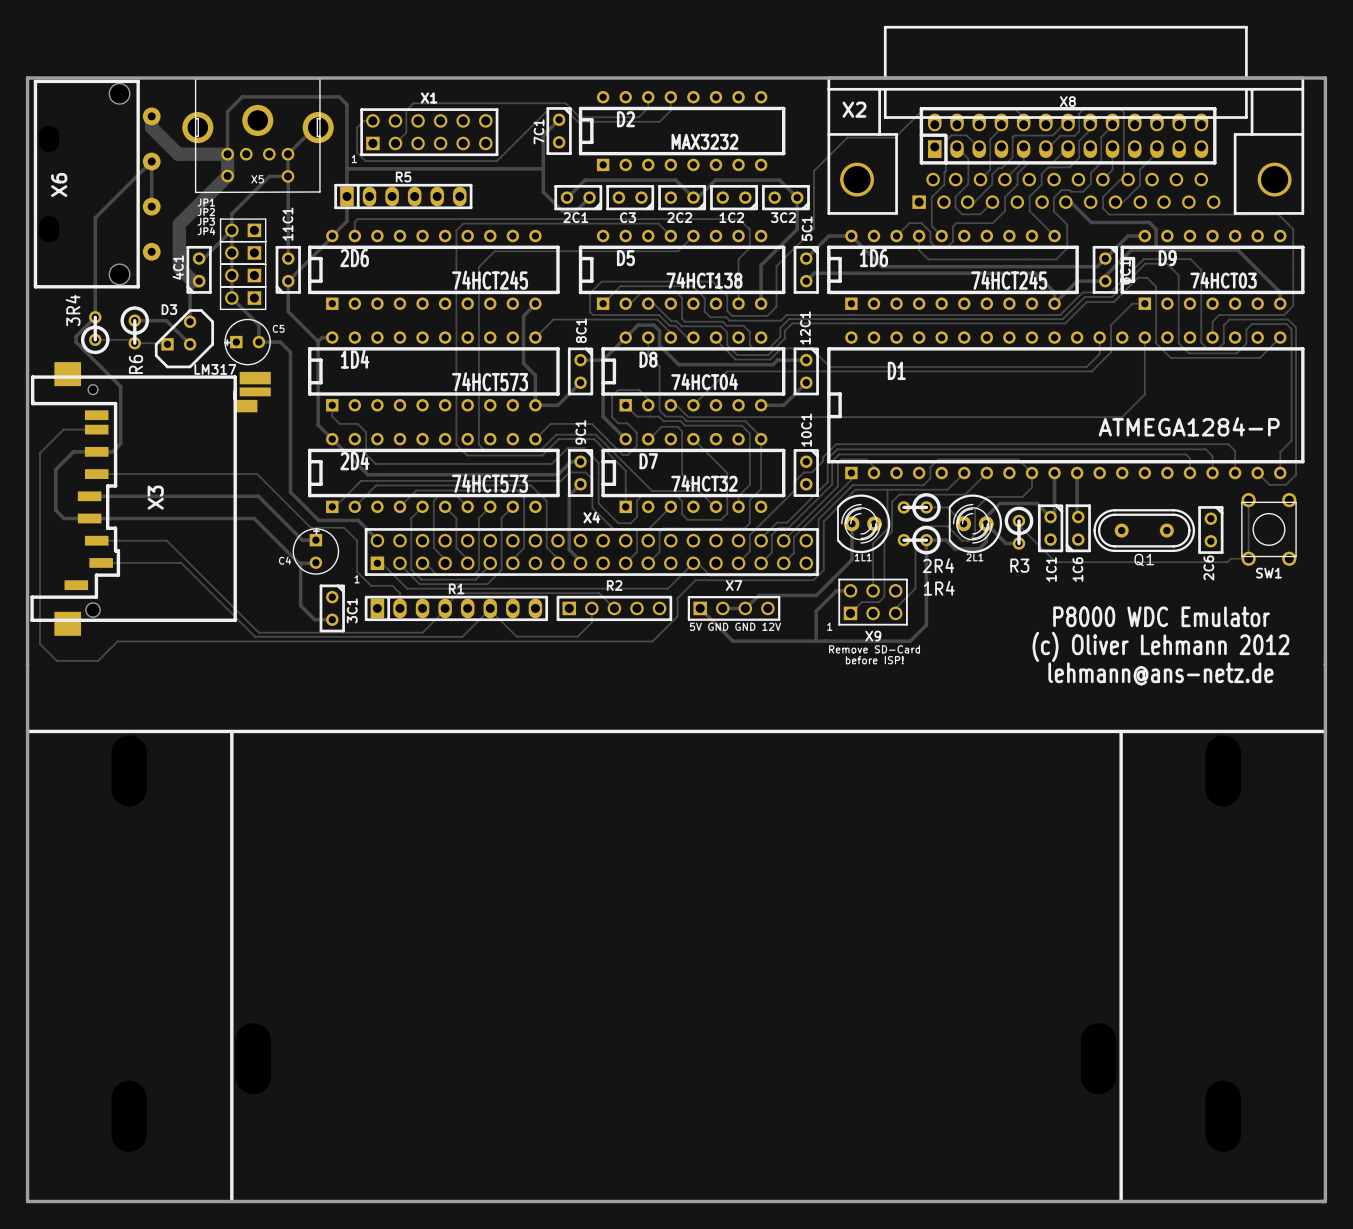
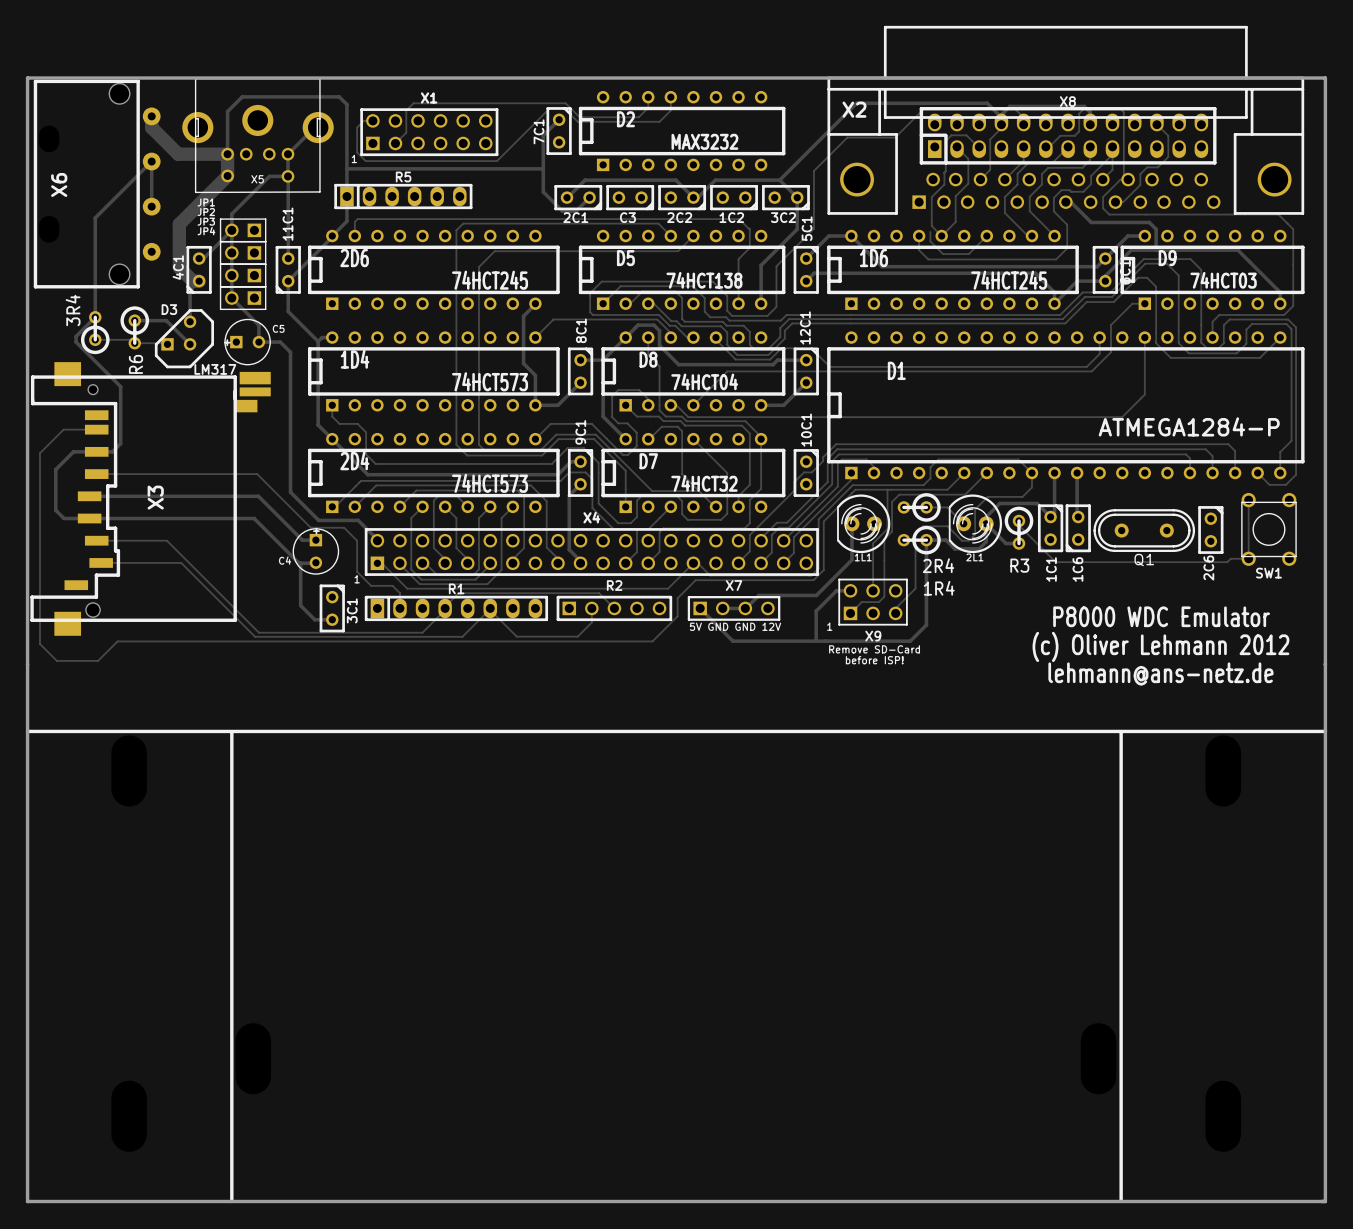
track: none -> (1001, 117) (987, 103) (856, 103) (779, 180)
track: none -> (1001, 124) (1001, 114) (1009, 106) (1084, 106) (1090, 112) (1090, 124)
track: (1068, 124) (1063, 124) (1052, 135) (1014, 135) (1012, 137) (1012, 157) (992, 174) (992, 184) (974, 202) (967, 202) -> none
track: (1090, 124) (1090, 129) (1079, 140) (1079, 157) (1069, 167) (1048, 167) (1041, 173) (1041, 184) (1029, 196) -> (1090, 146) (1090, 160) (1082, 167) (1048, 167) (1041, 174) (1041, 184) (1029, 196)
track: (1112, 124) (1101, 137) (1101, 162) (1090, 173) (1090, 183) (1082, 191) -> (1112, 154) (1091, 175) (1091, 184) (1082, 191)
track: (1156, 146) (1156, 152) (1140, 169) (1140, 185) -> (1156, 124) (1168, 135) (1168, 157) (1157, 167) (1147, 167) (1140, 174) (1140, 185)
track: (968, 183) (955, 196) (955, 207) (962, 214) (980, 214) (992, 202) -> (968, 183) (955, 196) (955, 222) (941, 236)
track: (1005, 196) (1005, 210) (992, 223) (956, 223) (952, 226) (952, 241) (946, 247) (936, 247) (930, 241) -> (986, 236) (968, 254) (943, 254) (930, 241)
track: none -> (1005, 196) (1004, 212) (1027, 236) (1031, 236)
track: (930, 231) (921, 223) (909, 223) (896, 236) -> none

